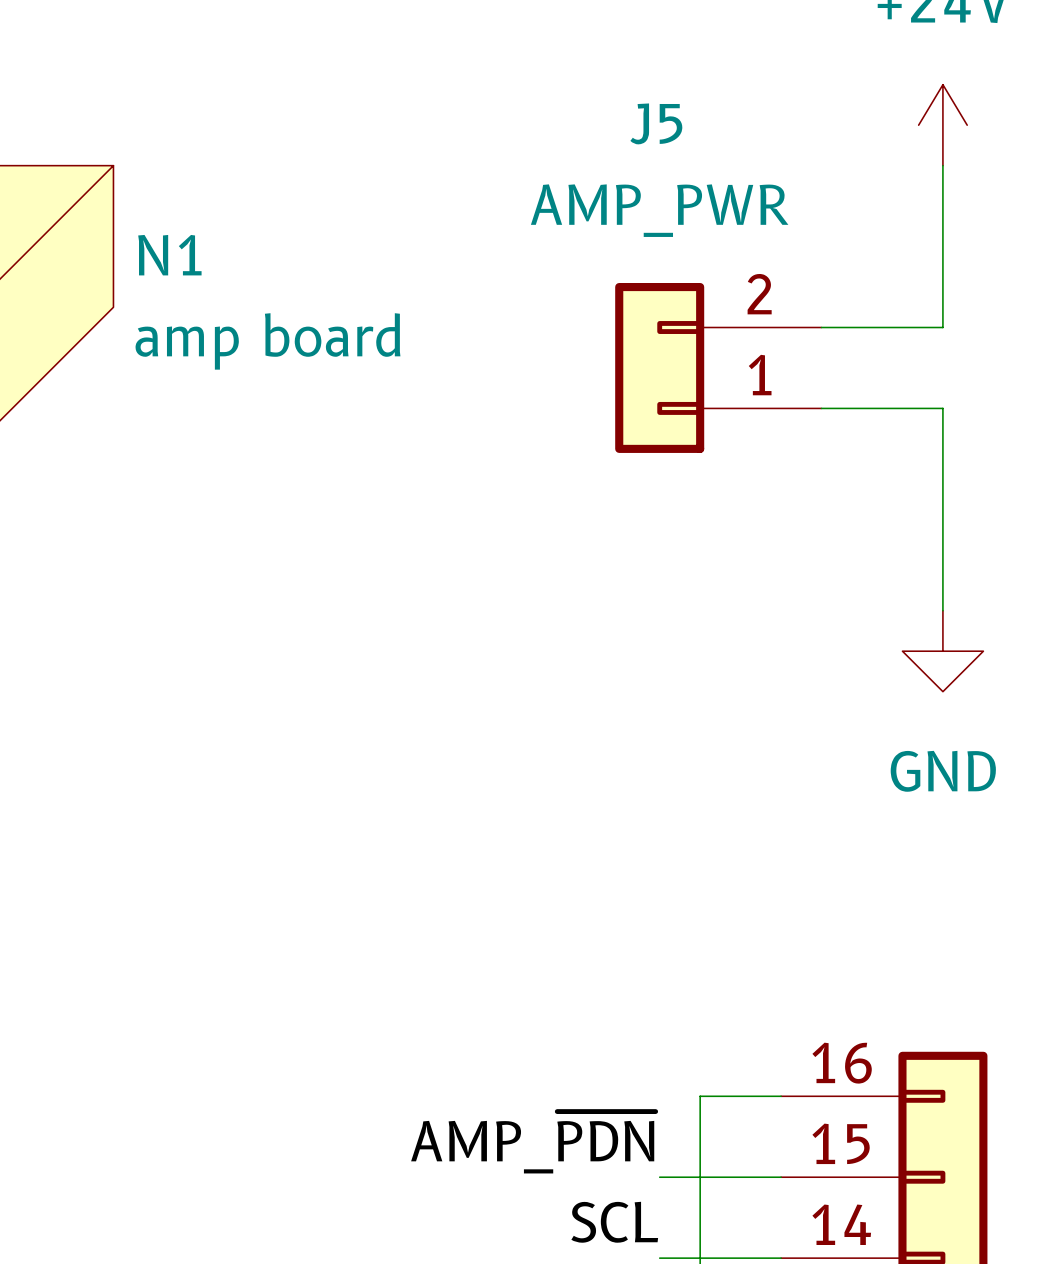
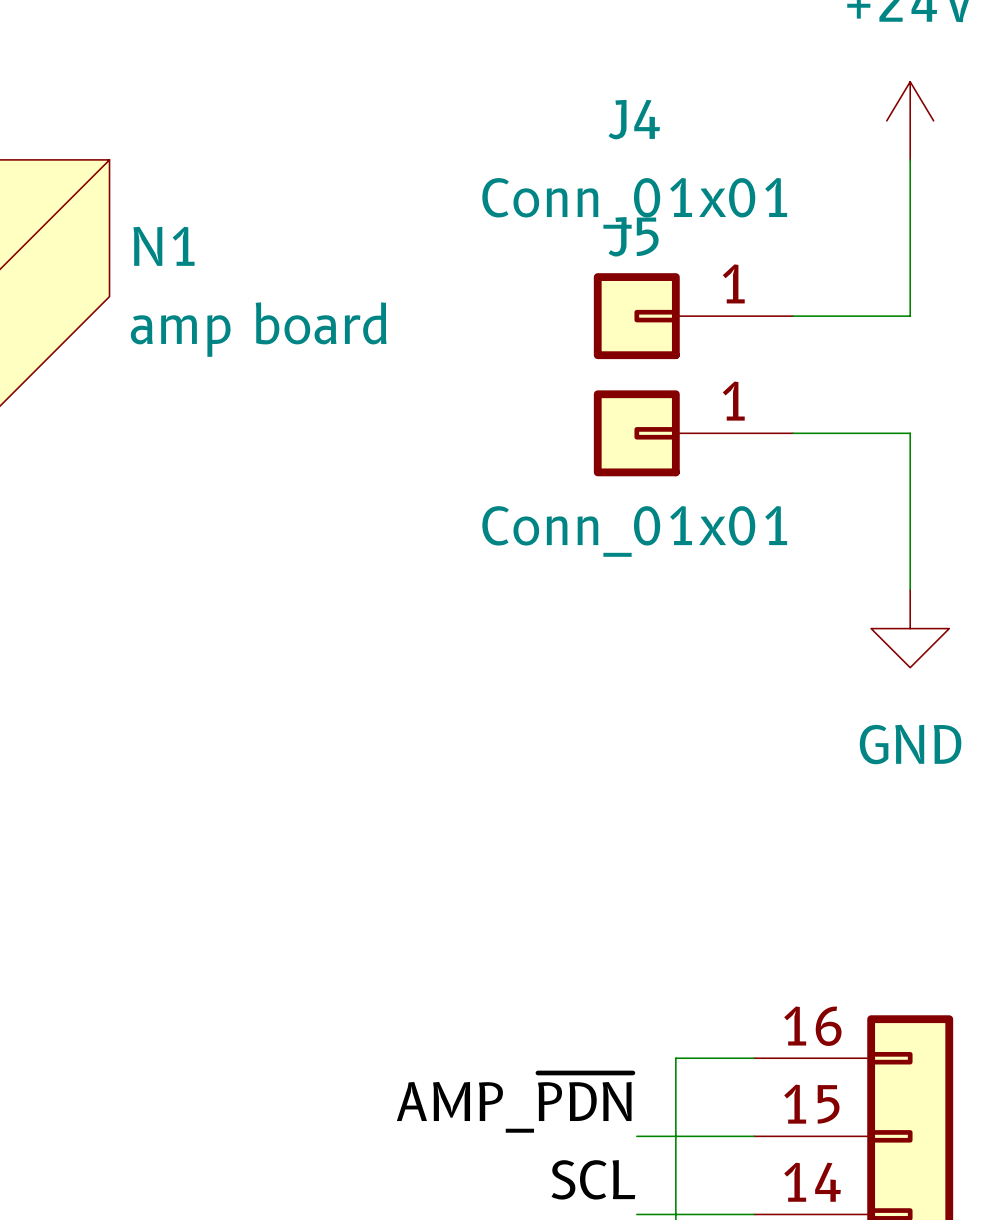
J5 value: AMP_PWR (659, 210) -> Conn_01x01 (634, 531)
J5 symbol: [615, 283, 822, 453] -> [593, 390, 794, 477]
J4: none -> Conn_01x01 (693, 316)
wire: (821, 408) (942, 408) (942, 448) -> (793, 433) (910, 433)

